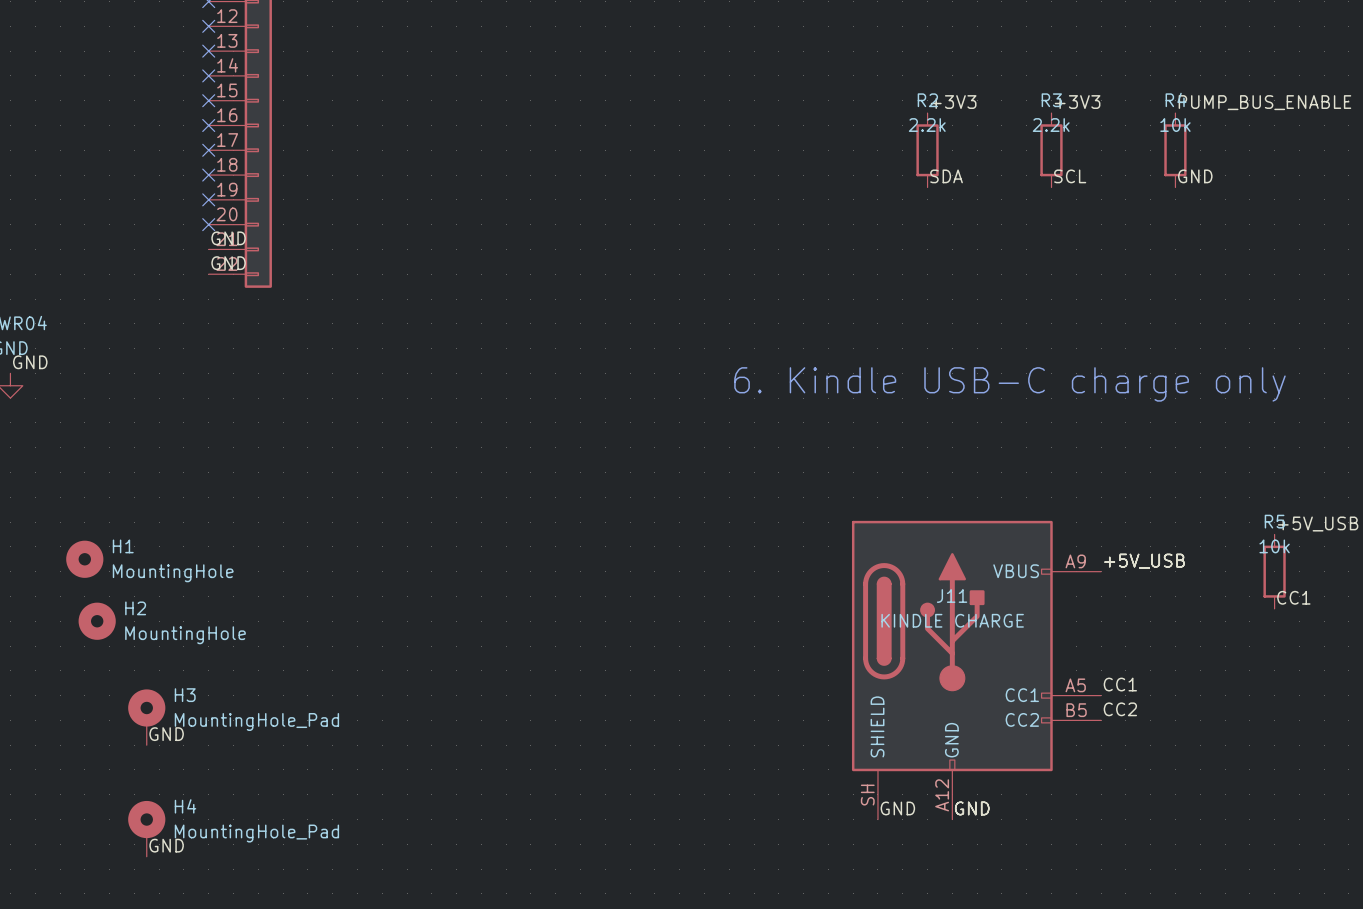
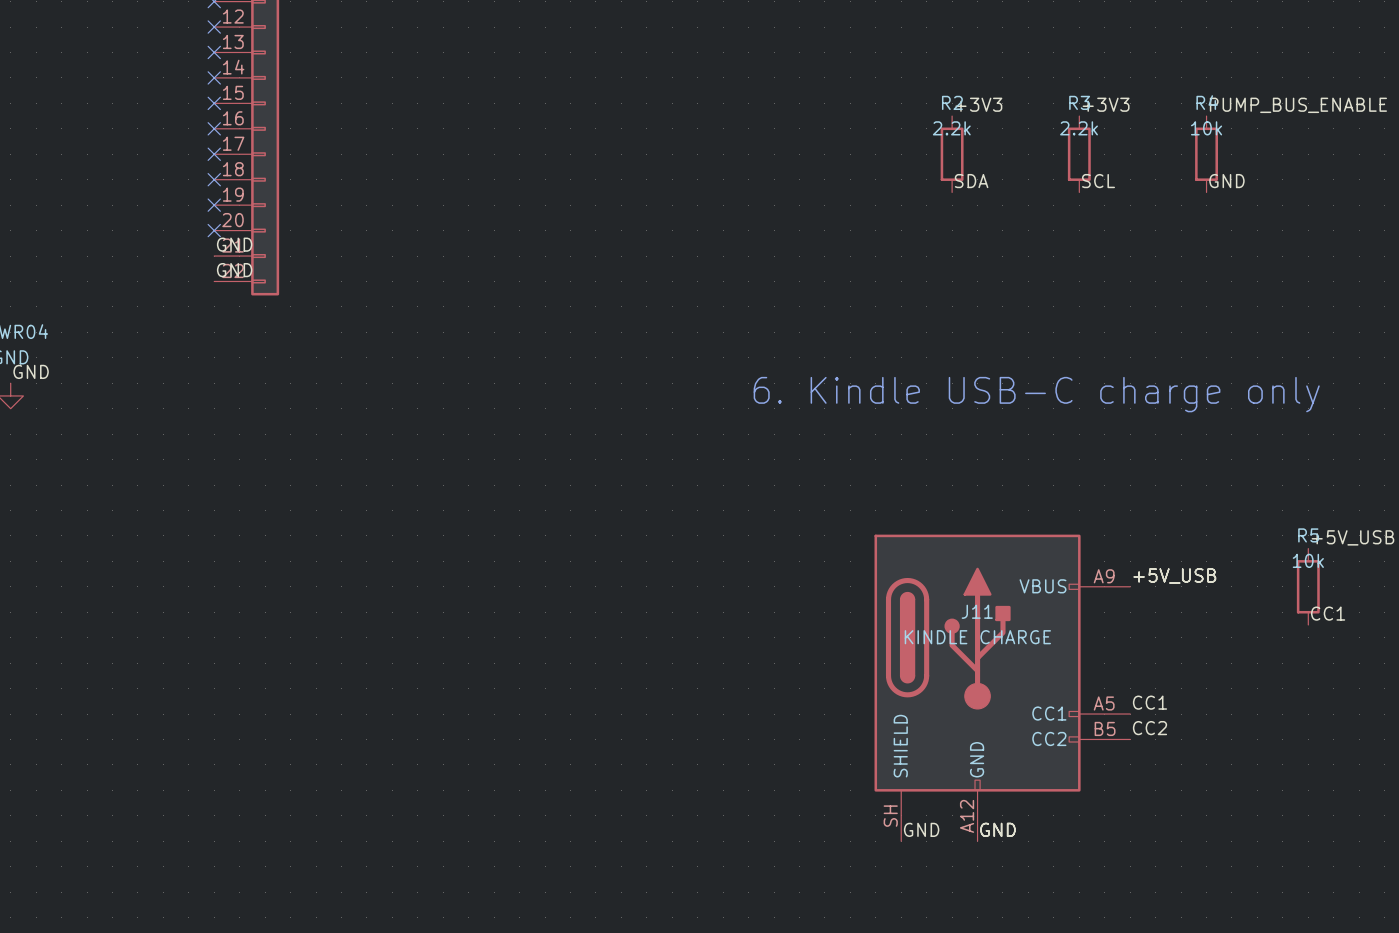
H1: MountingHole (84, 559) -> none
H2: MountingHole (97, 621) -> none
H3: MountingHole_Pad (146, 717) -> none
label: GND (166, 734) -> none
H4: MountingHole_Pad (146, 828) -> none
label: GND (166, 845) -> none

